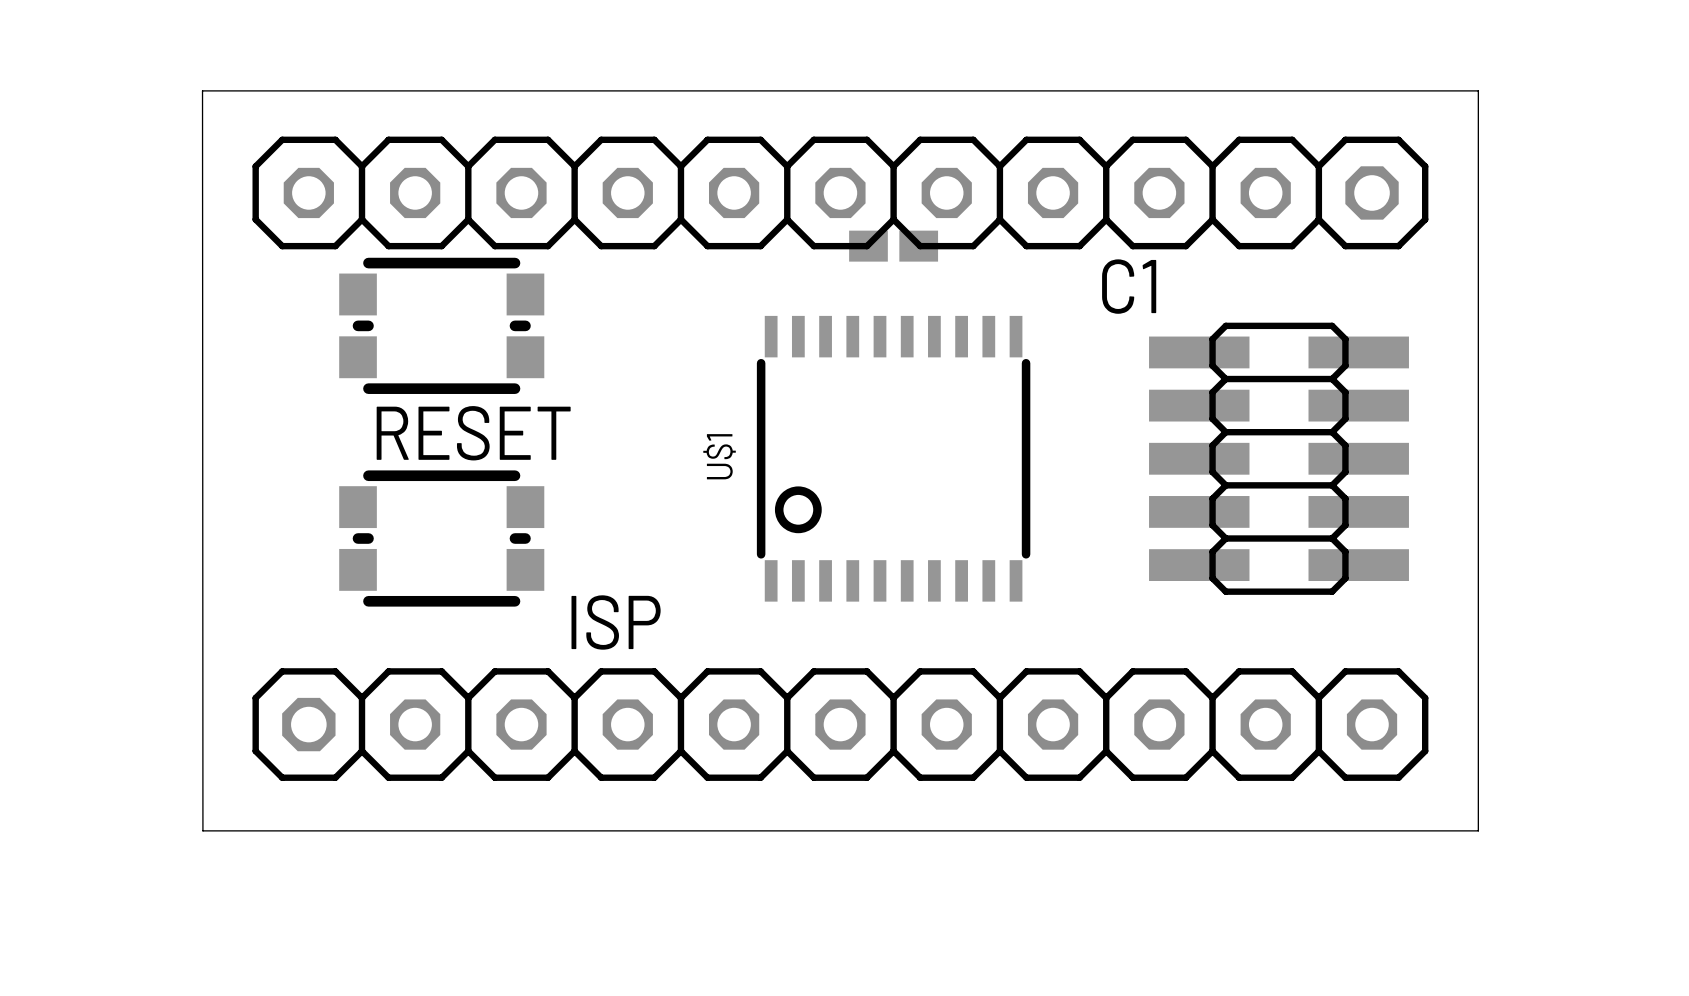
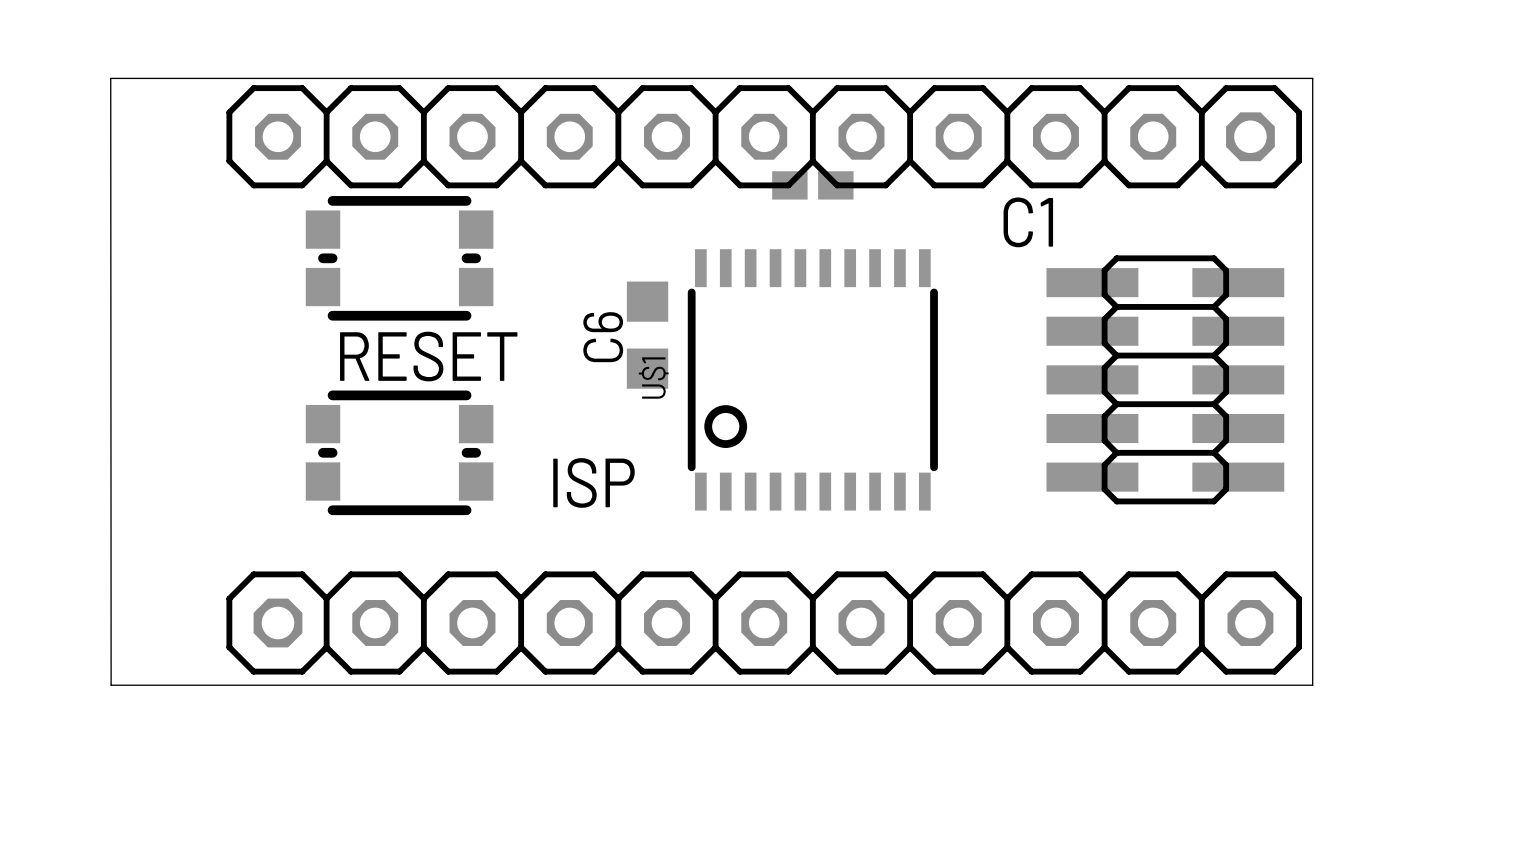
board edge: (202, 90) (1478, 90) (1478, 830) (202, 830) (202, 90) -> (110, 78) (111, 685) (1312, 685) (1312, 78) (110, 78)
C6: none -> (647, 335)
part value position: ISP (616, 622) -> ISP (594, 482)

